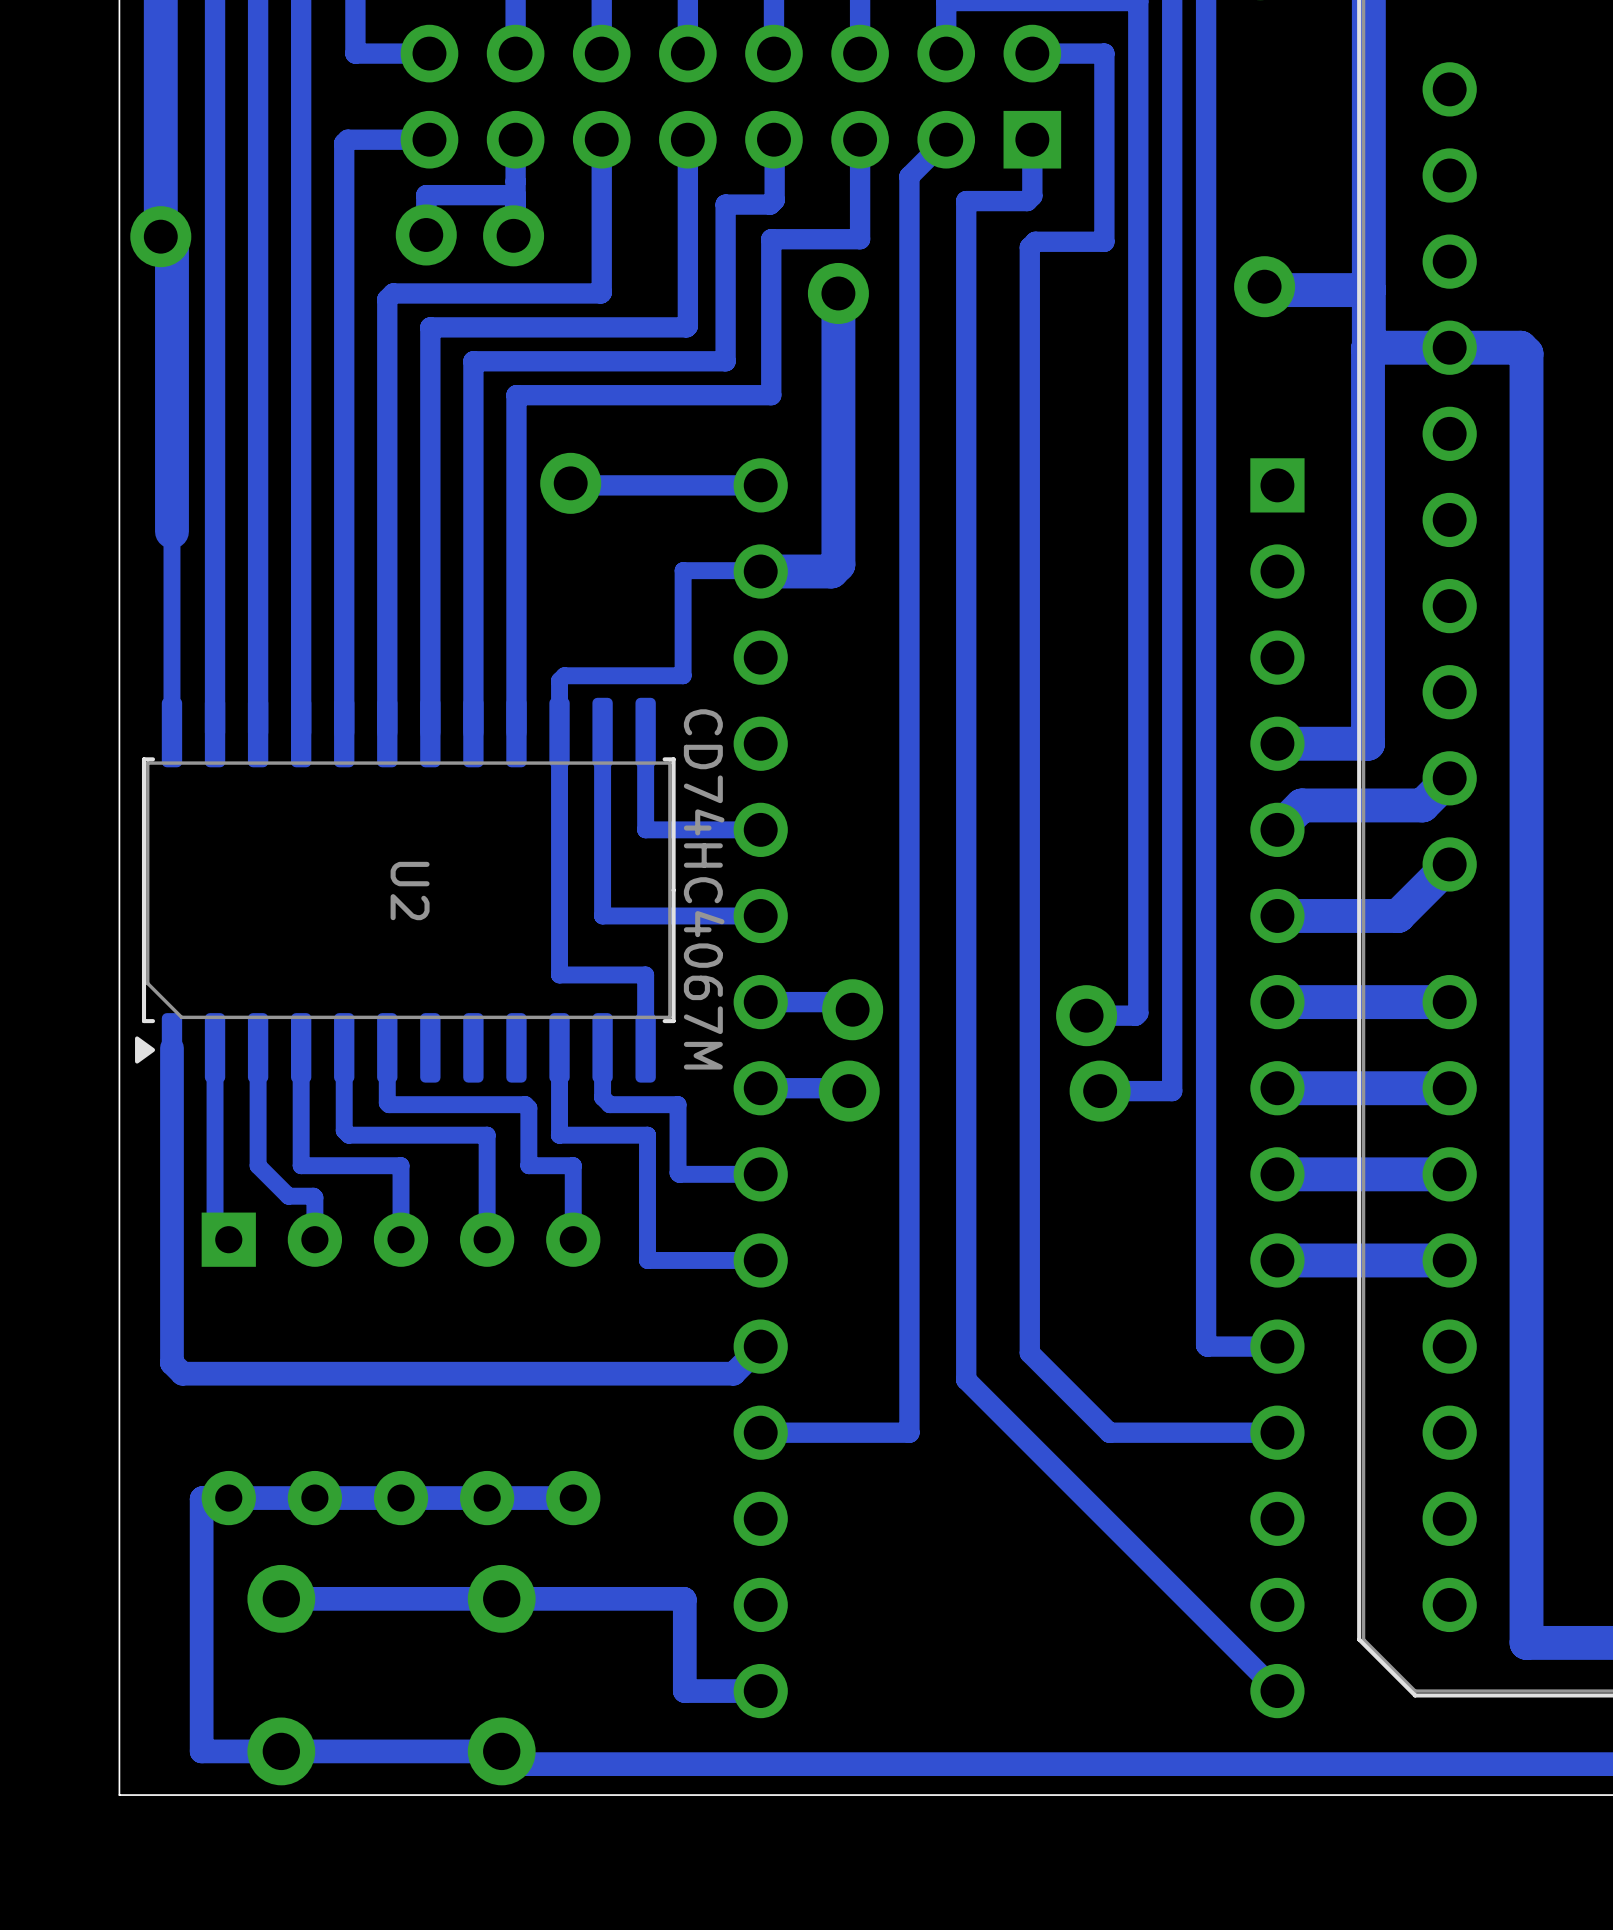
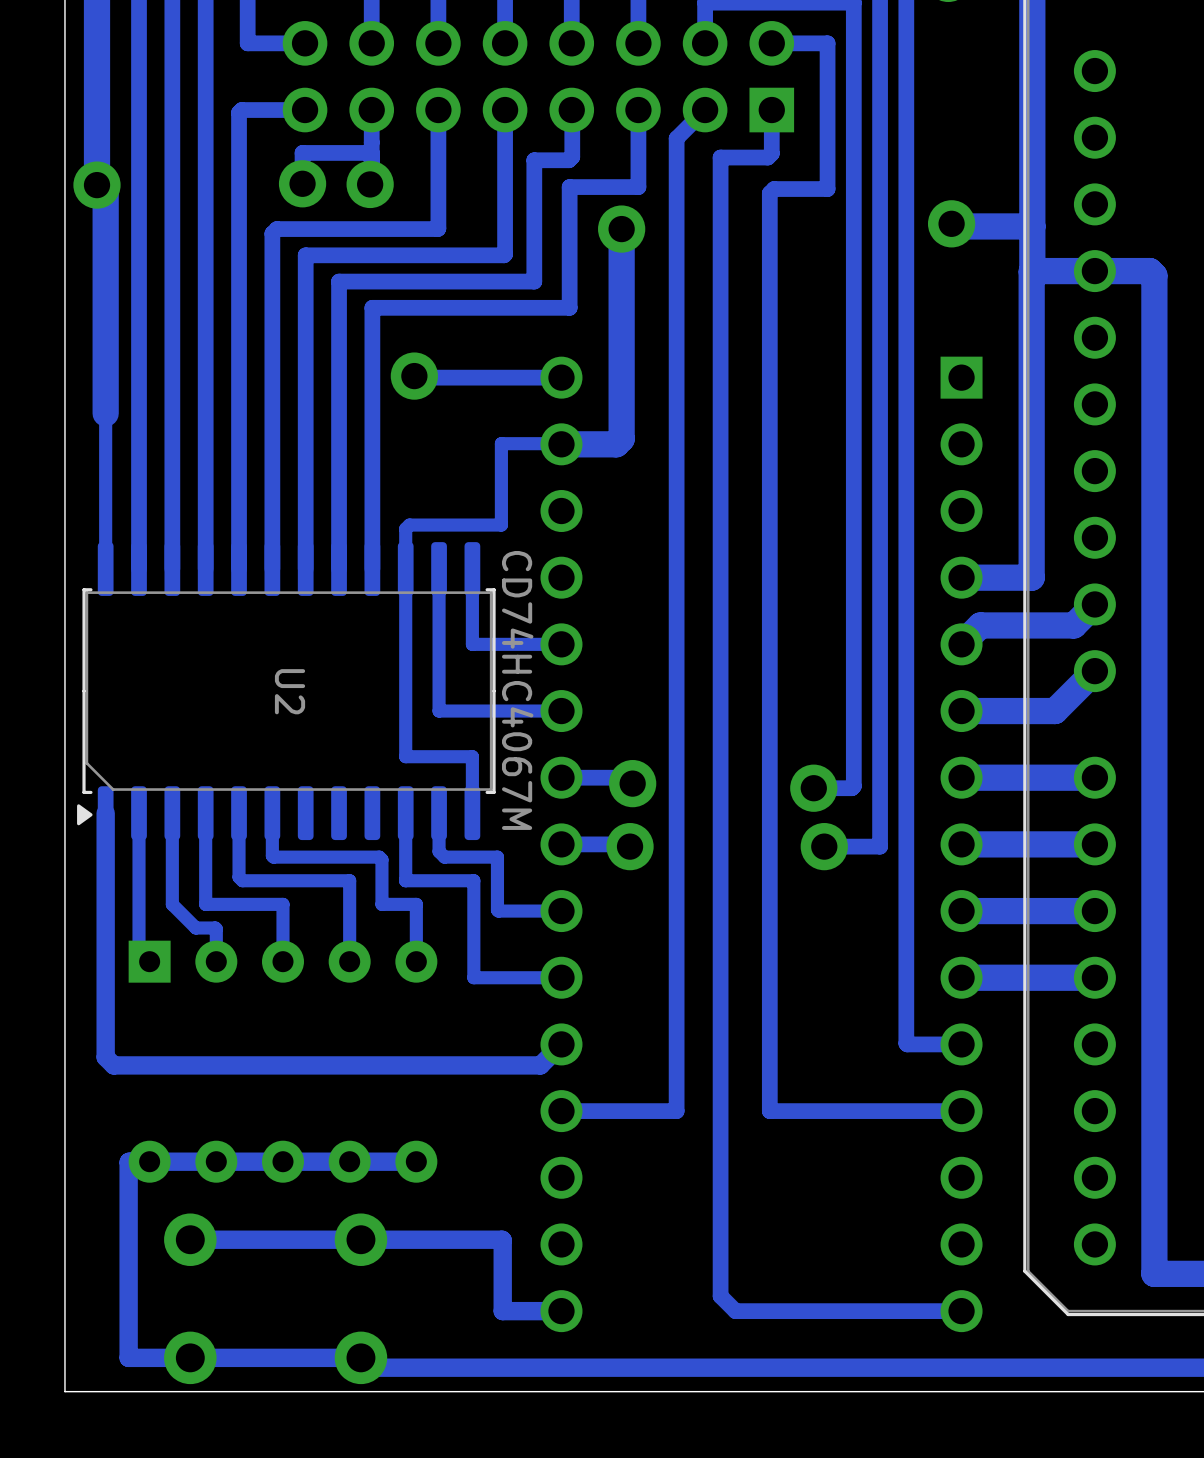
track: (1029, 1353) (1109, 1432) -> (769, 1049) (769, 1111) (831, 1111)
track: (966, 1379) (1277, 1691) -> (720, 1070) (720, 1296) (735, 1311) (961, 1311)

